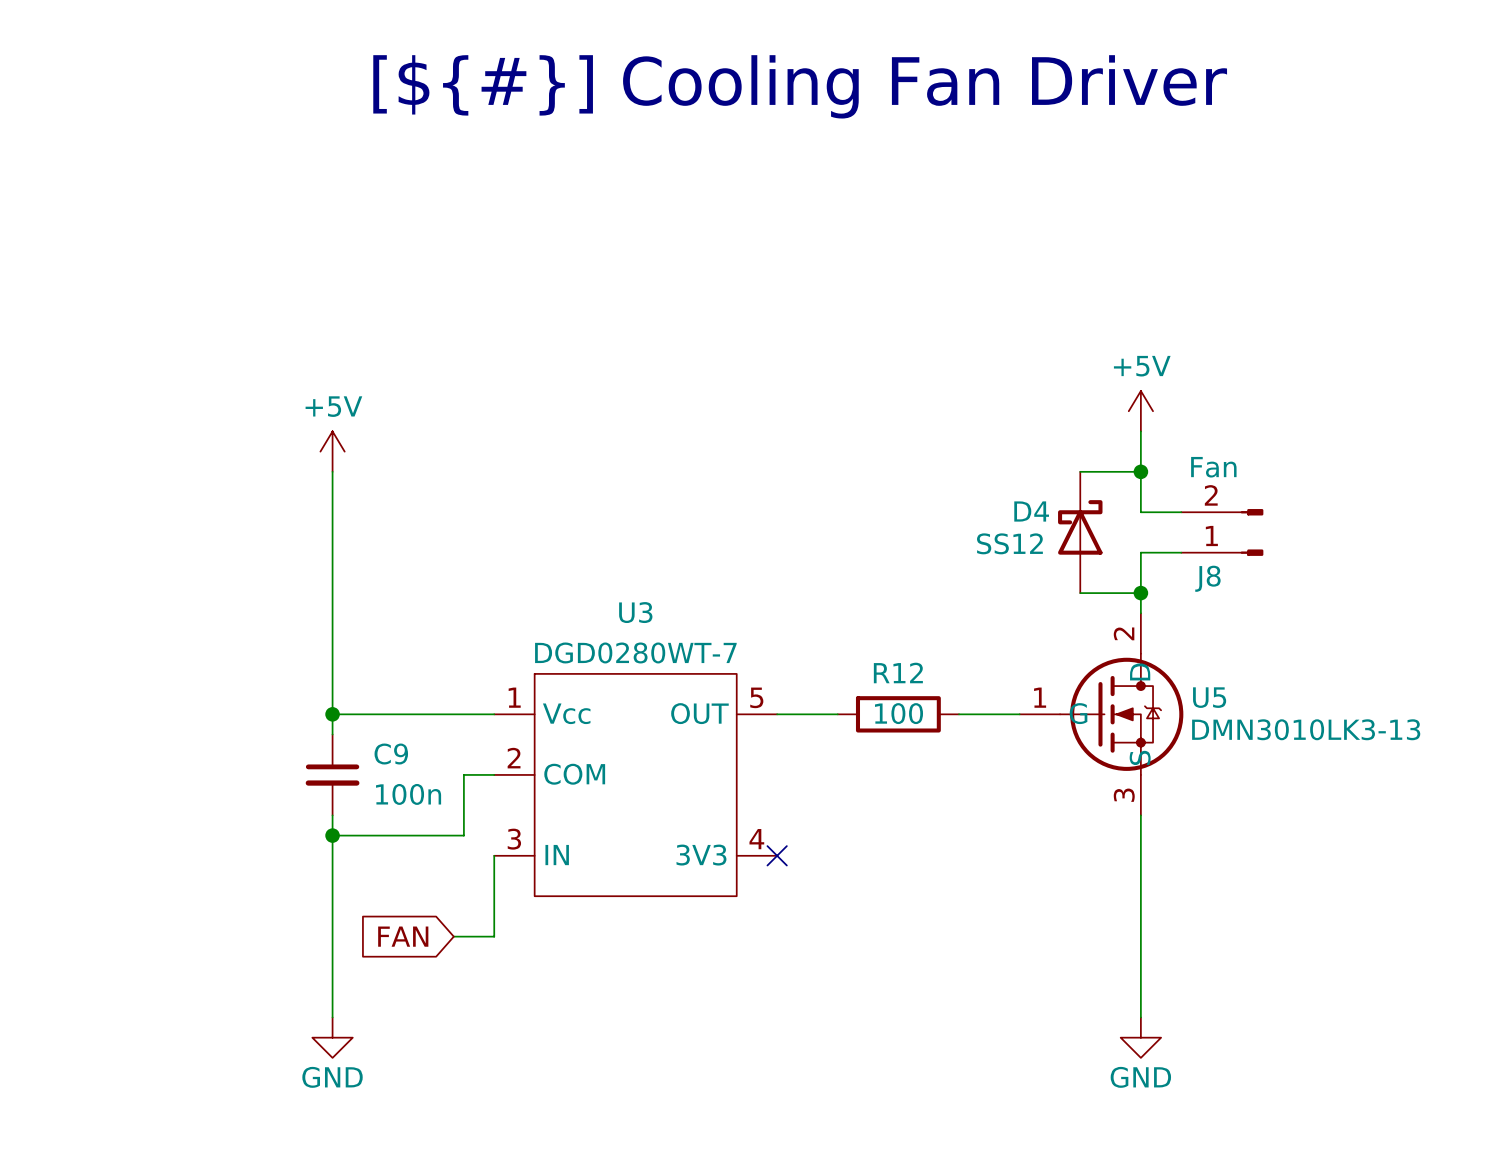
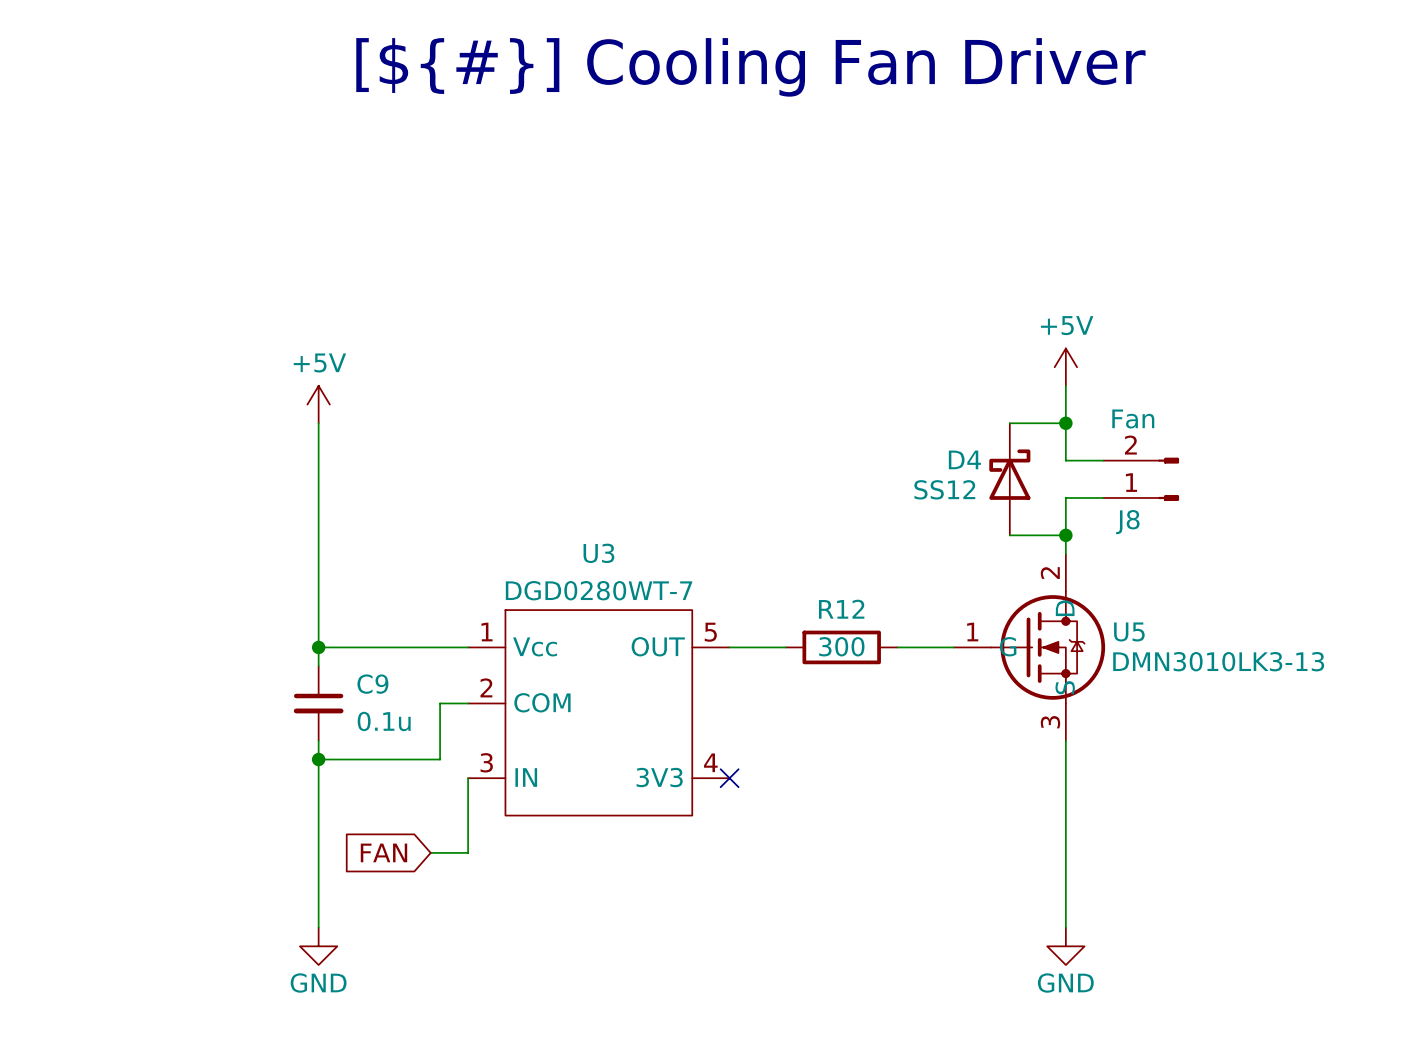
R12 value: 100 (899, 713) -> 300 (841, 646)
C9 value: 100n (408, 794) -> 0.1u (384, 721)

